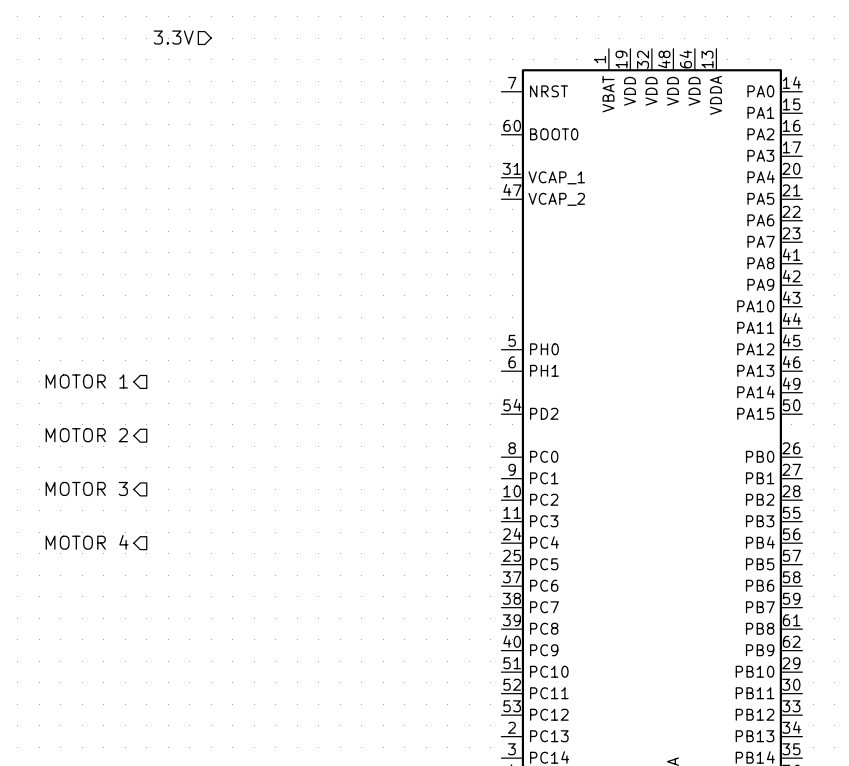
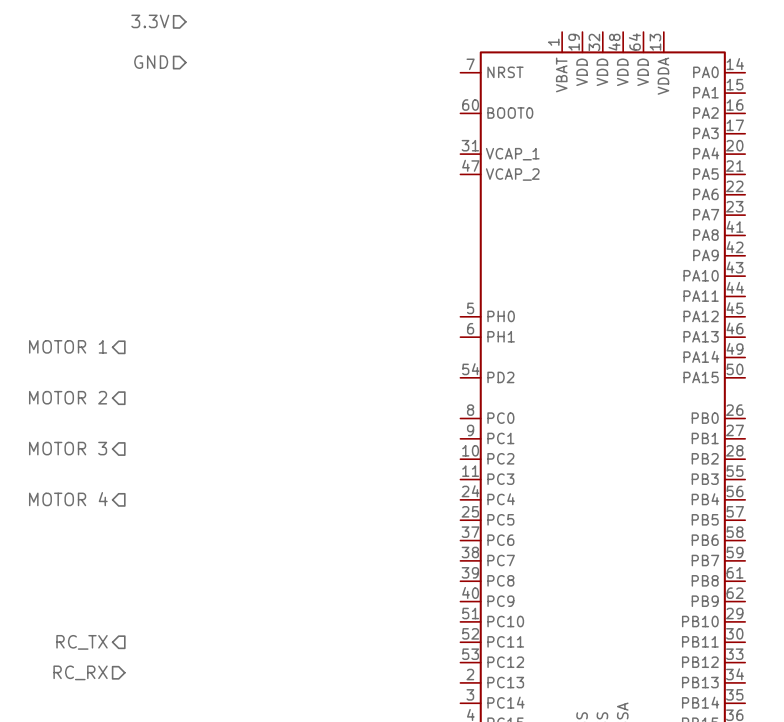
hierarchical label: none -> GND (151, 62)
hierarchical label: none -> RC_TX (82, 642)
hierarchical label: none -> RC_RX (80, 672)

